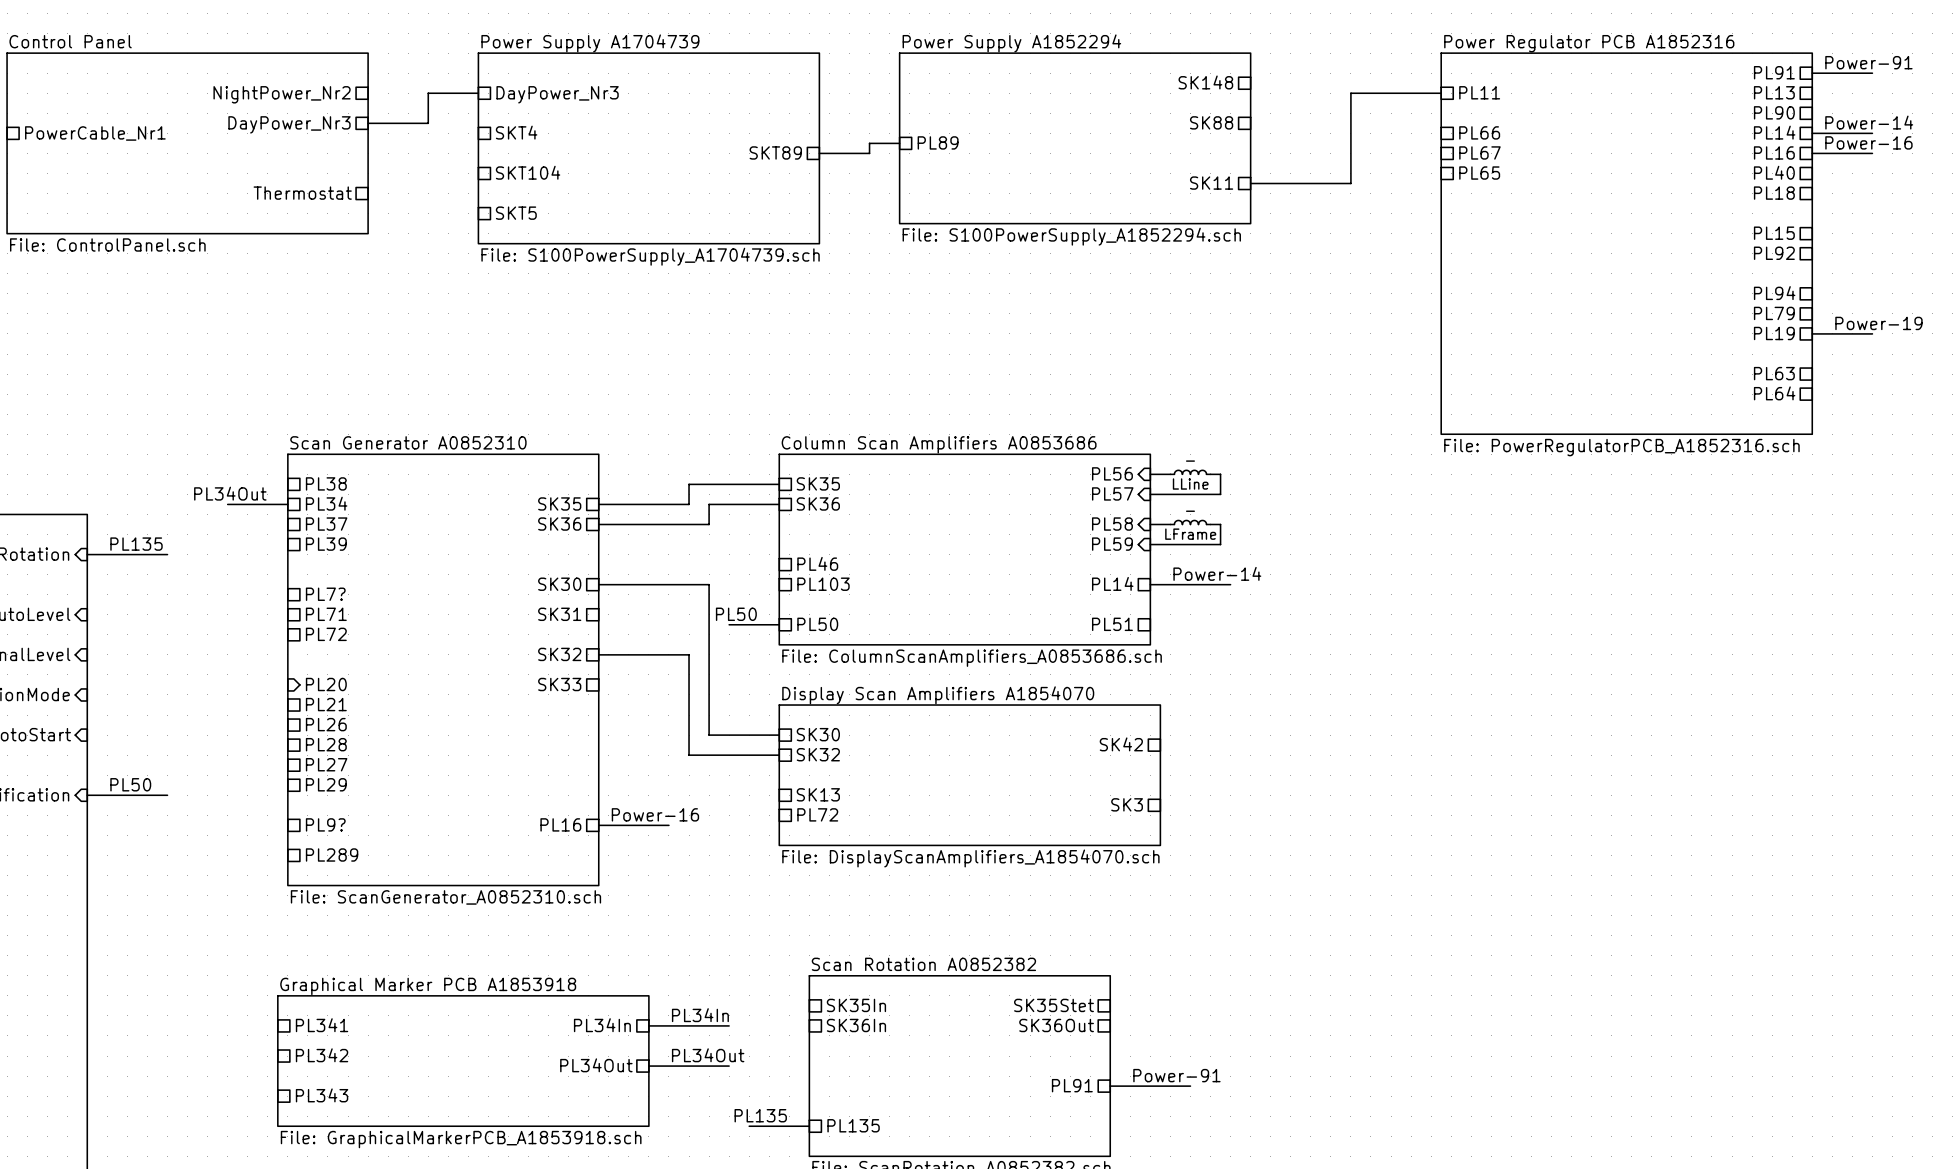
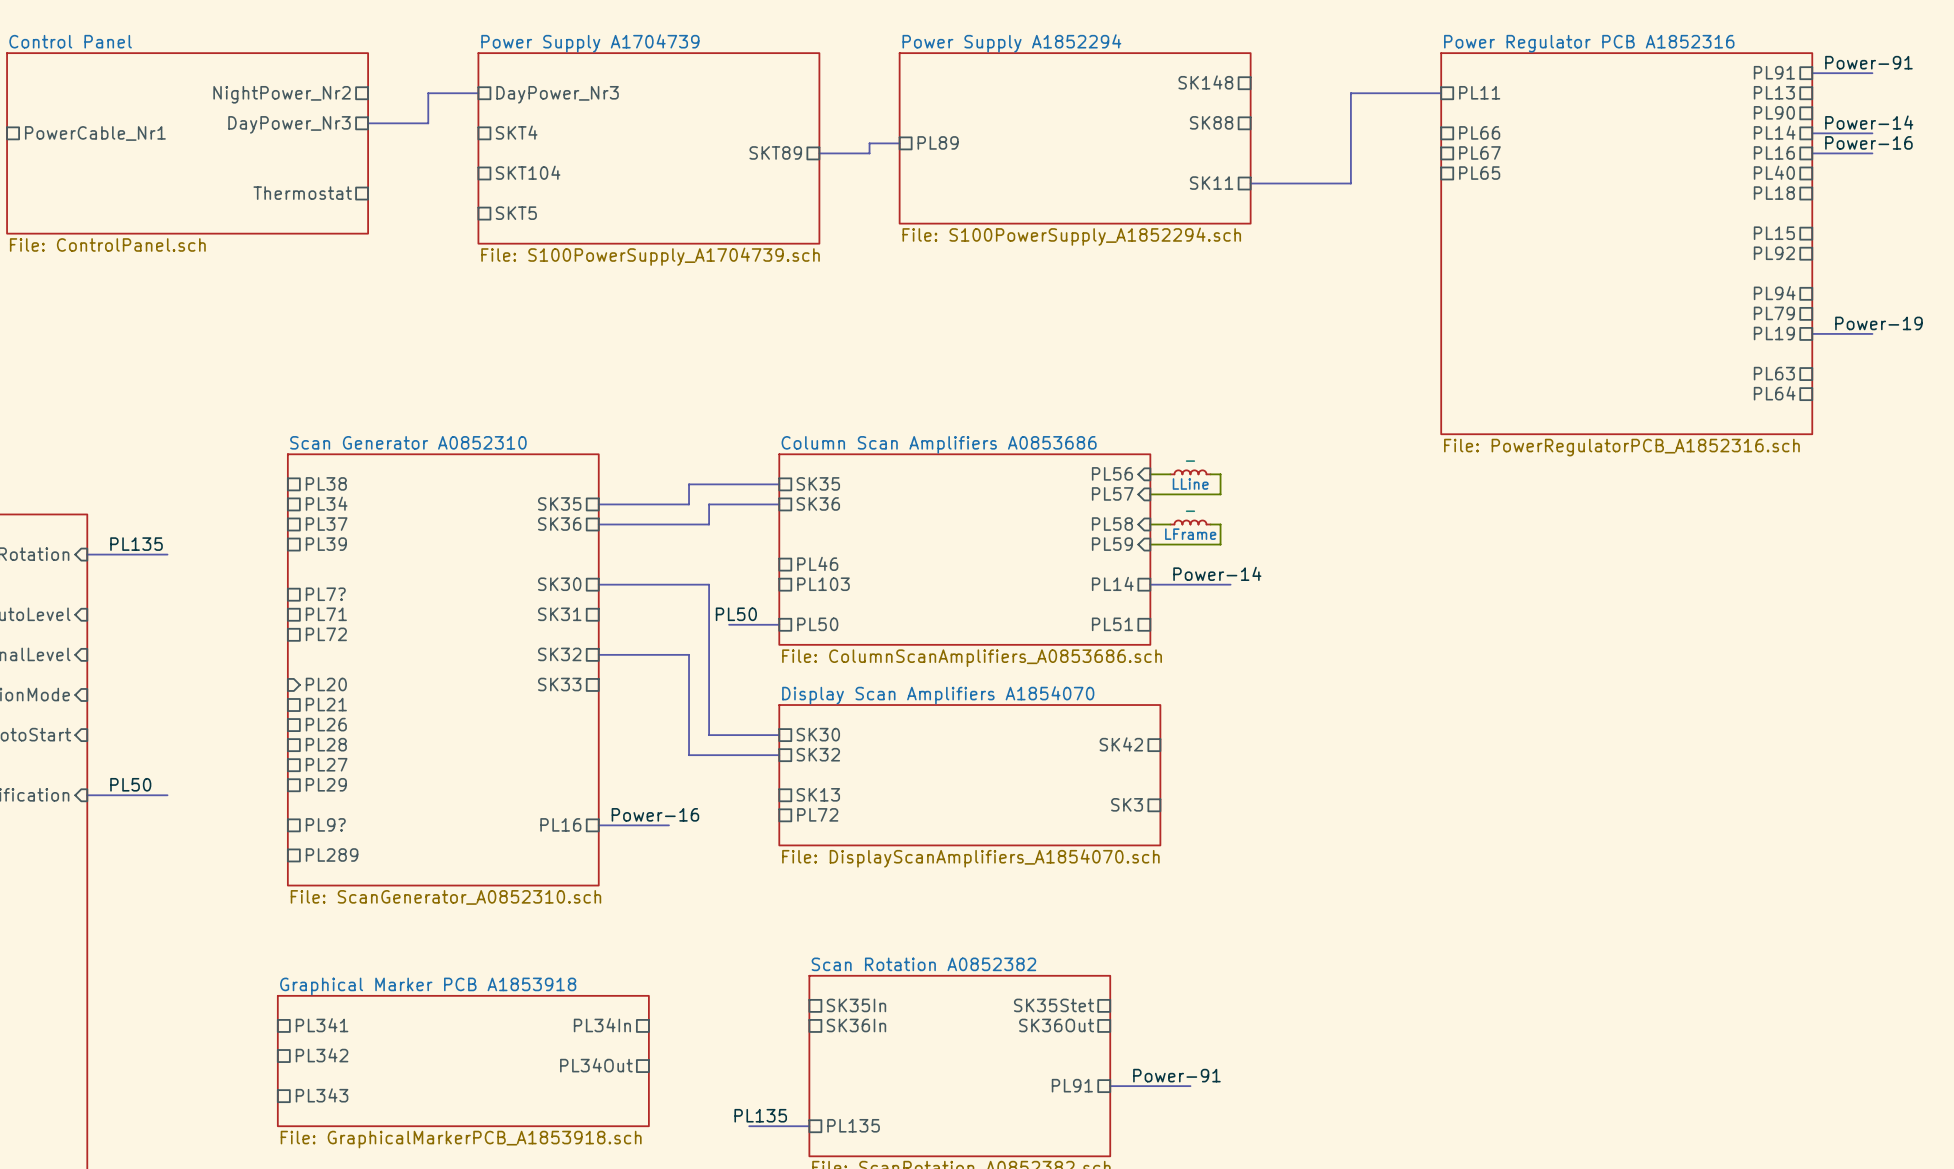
label: PL34Out (230, 493) -> none
bus: (227, 504) (287, 504) -> none
label: PL34In (700, 1015) -> none
bus: (648, 1025) (729, 1025) -> none
label: PL34Out (708, 1055) -> none
bus: (648, 1066) (729, 1066) -> none

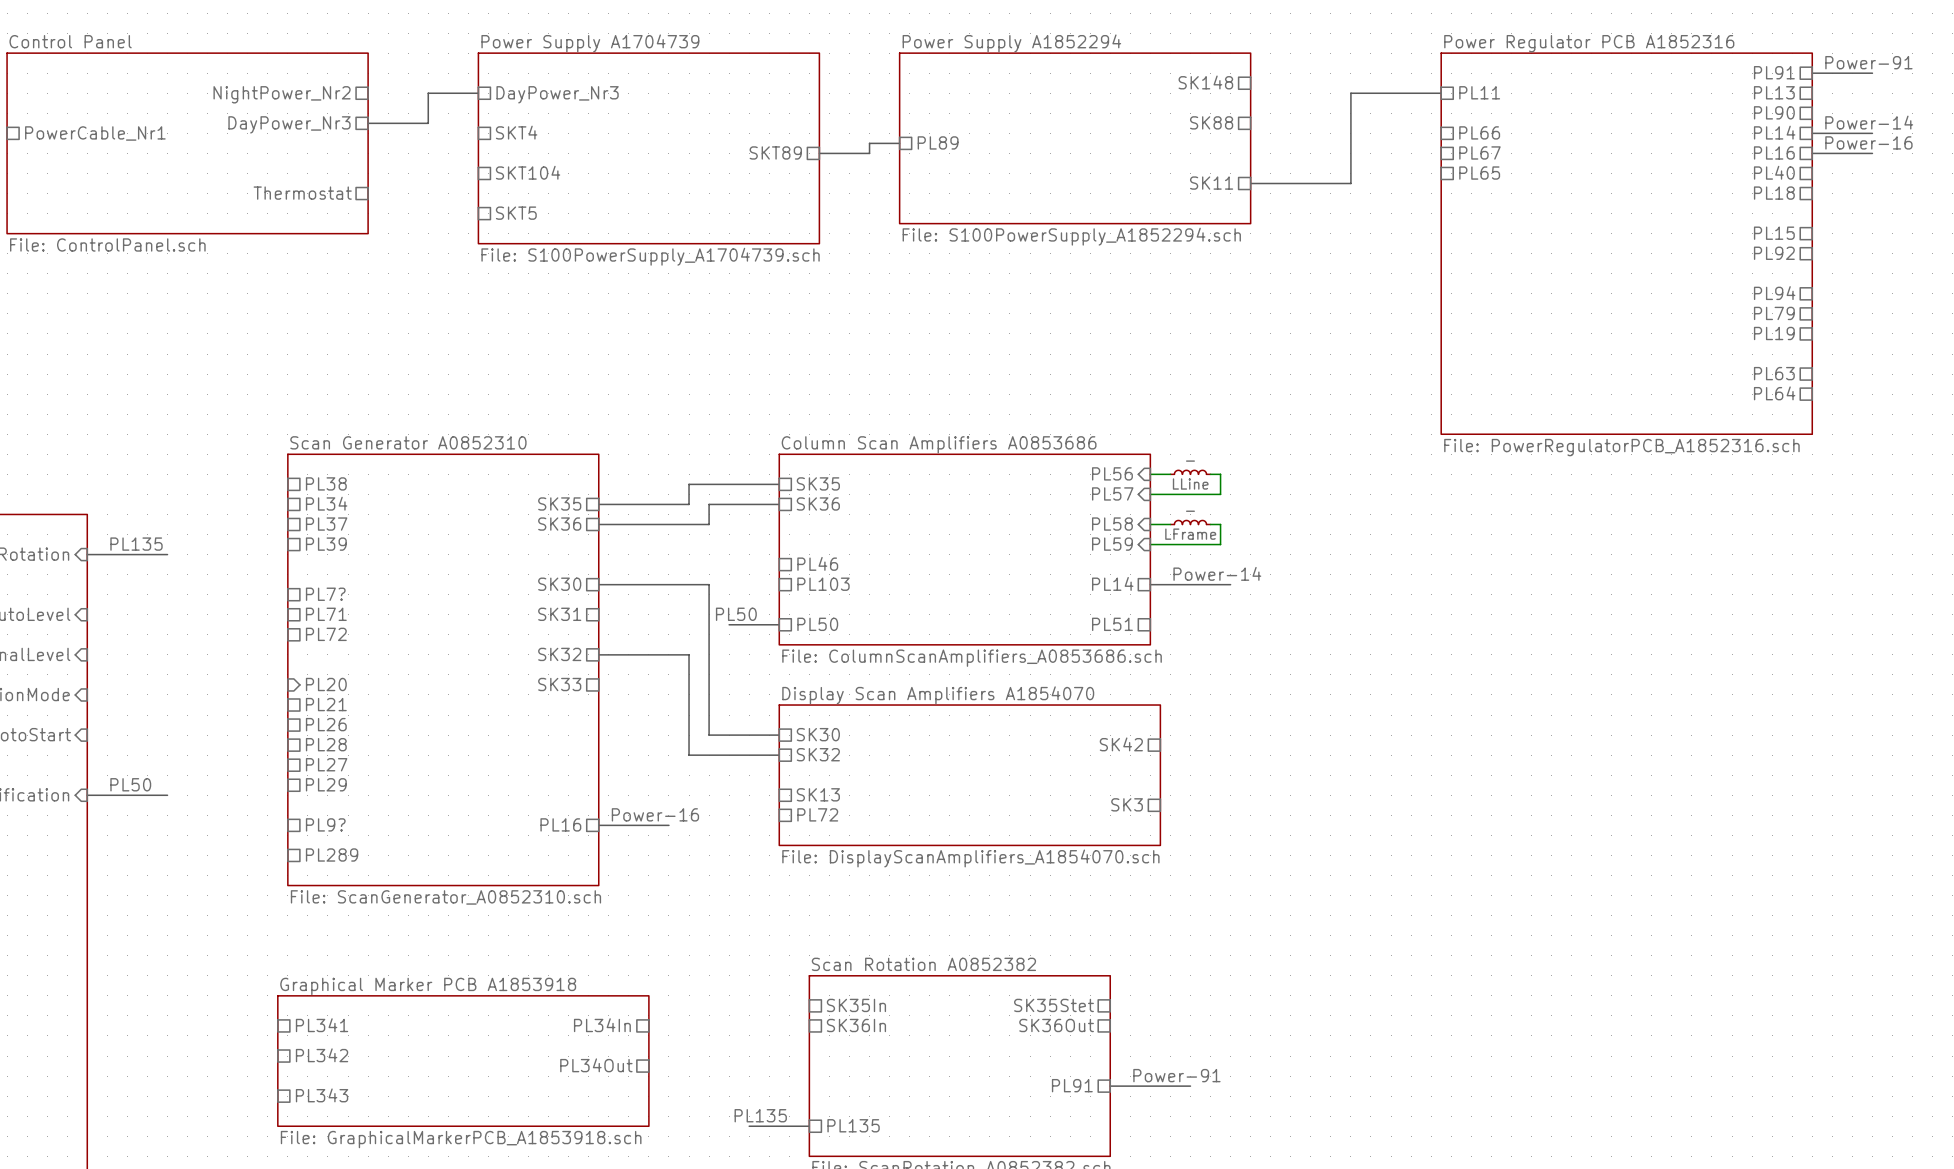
label: Power-19 (1878, 323) -> none
bus: (1812, 333) (1872, 333) -> none

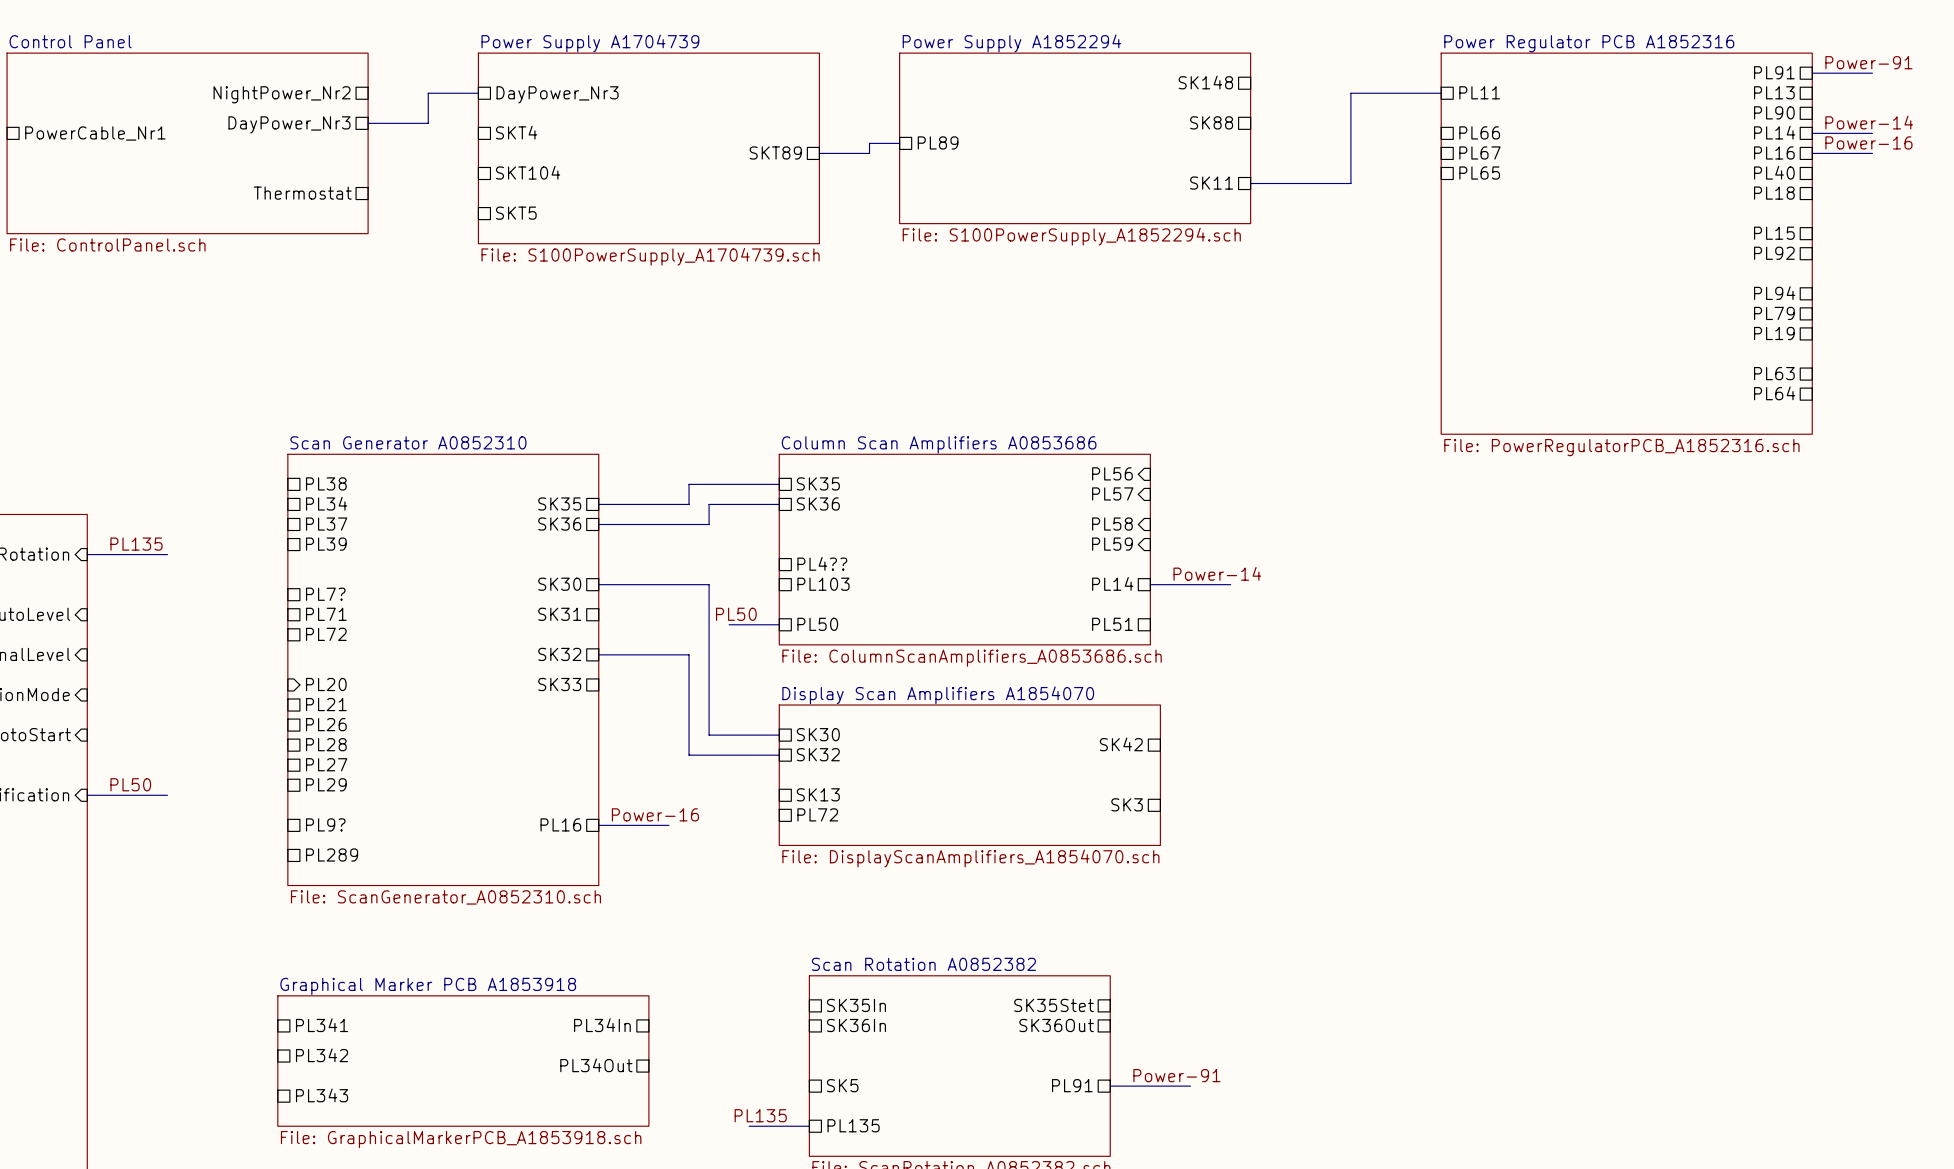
LLine: _ (1190, 472) -> none
wire: (1150, 474) (1170, 474) -> none
wire: (1210, 474) (1220, 474) (1220, 494) (1150, 494) -> none
LFrame: _ (1190, 522) -> none
wire: (1150, 524) (1170, 524) -> none
wire: (1210, 524) (1220, 524) (1220, 544) (1150, 544) -> none
sheet pin: PL46 (817, 563) -> PL4?? (822, 563)
sheet pin: none -> SK5 (842, 1085)

